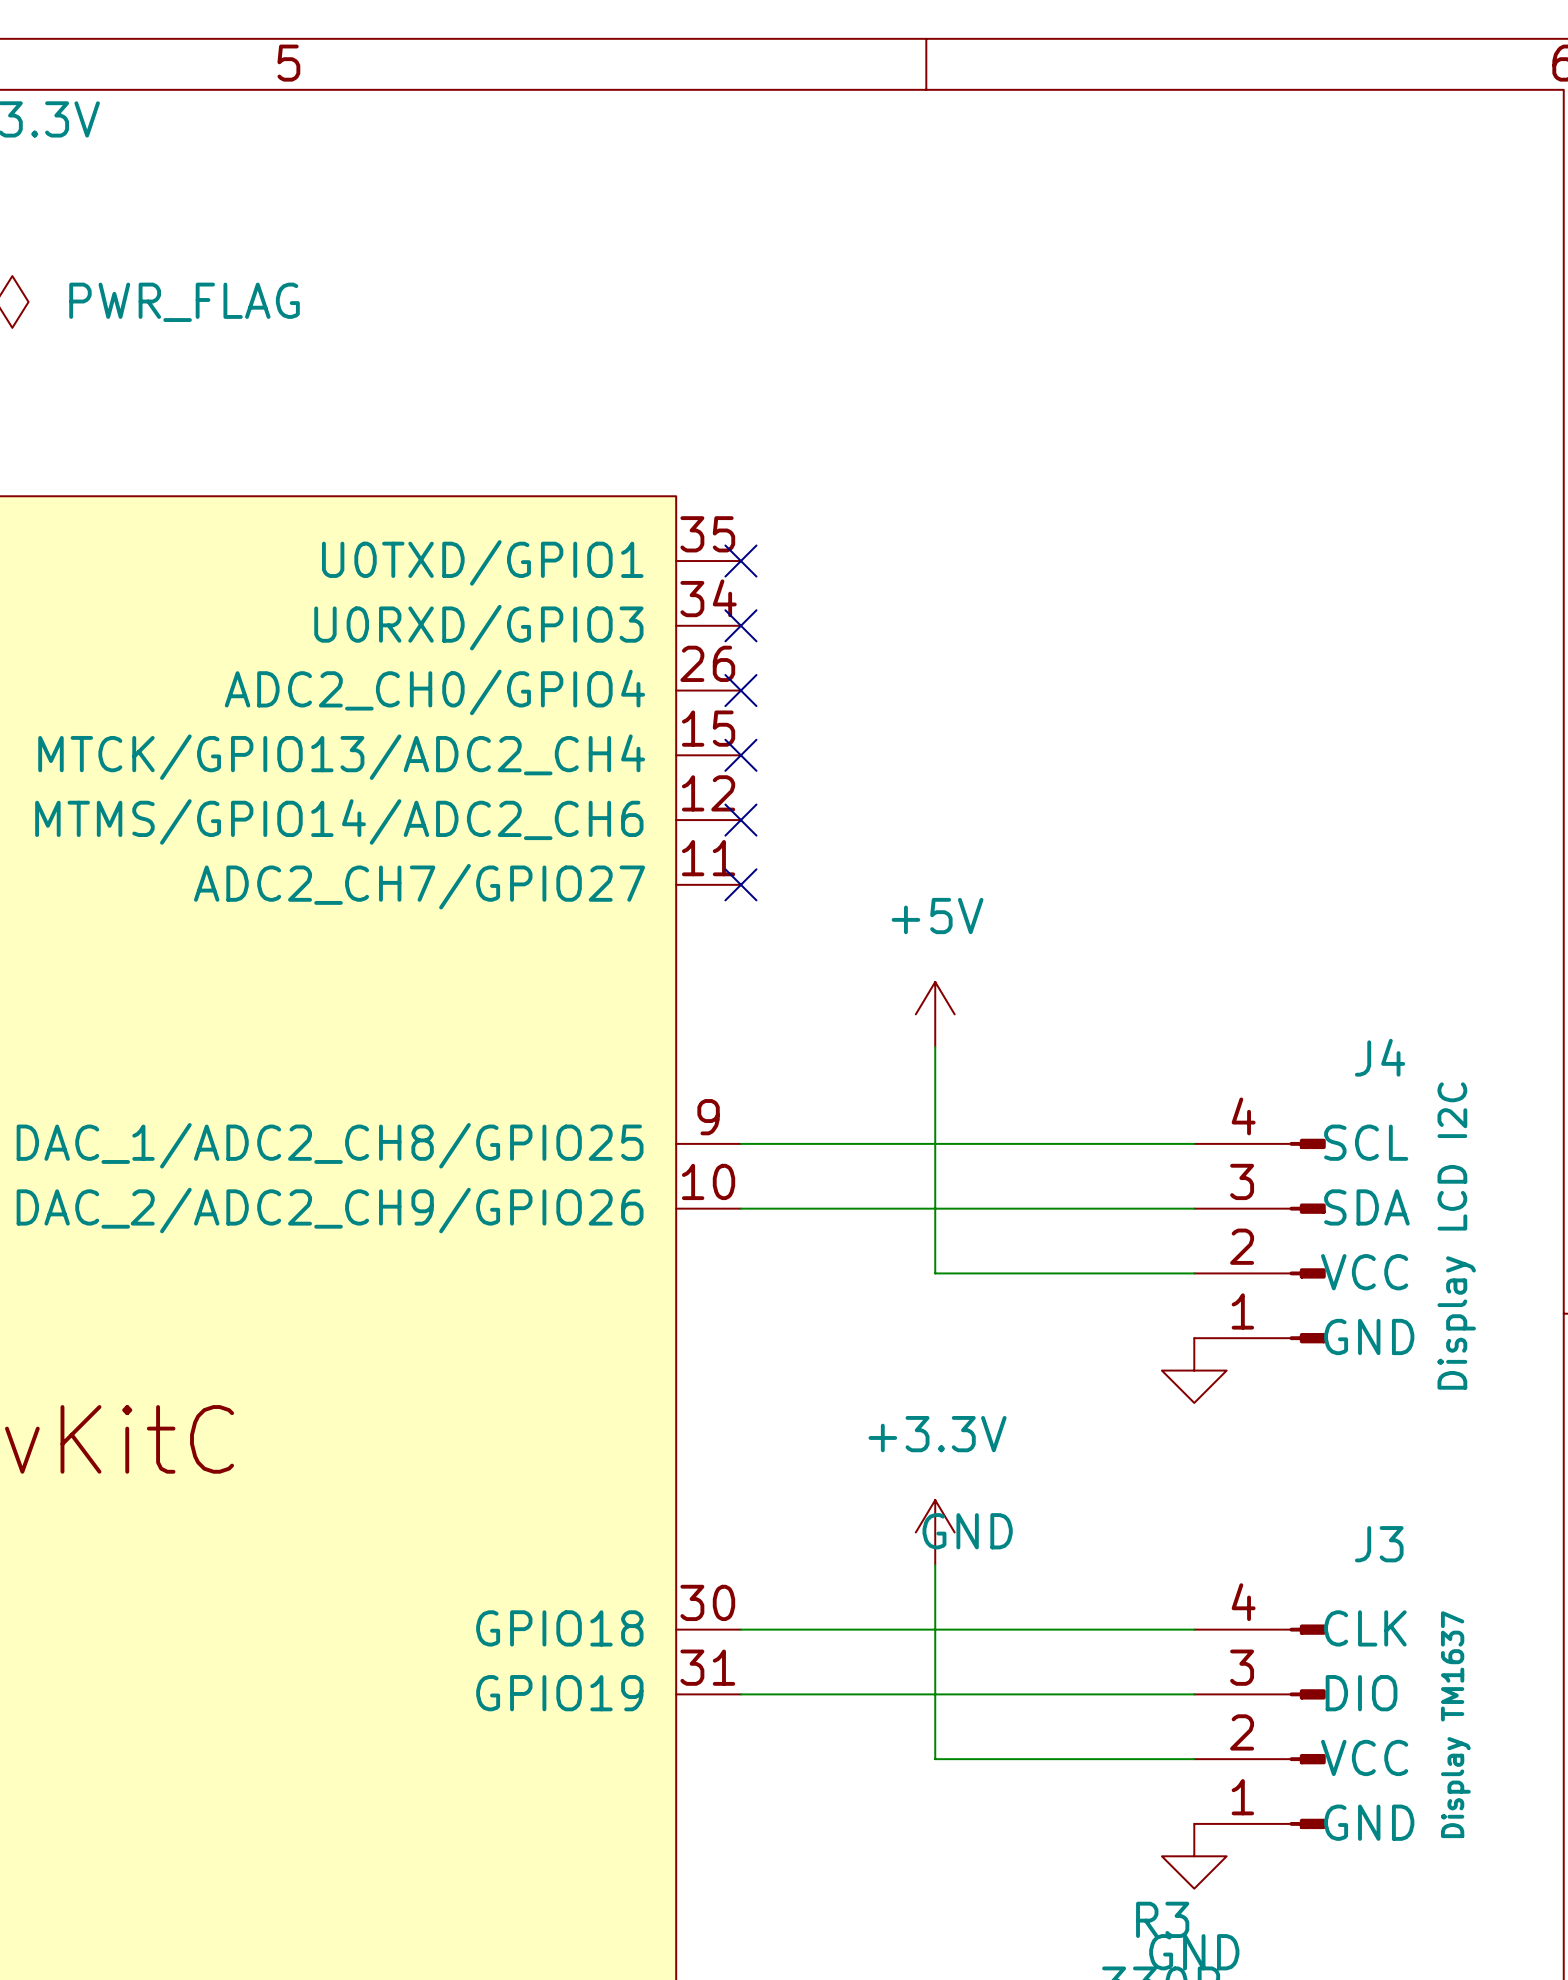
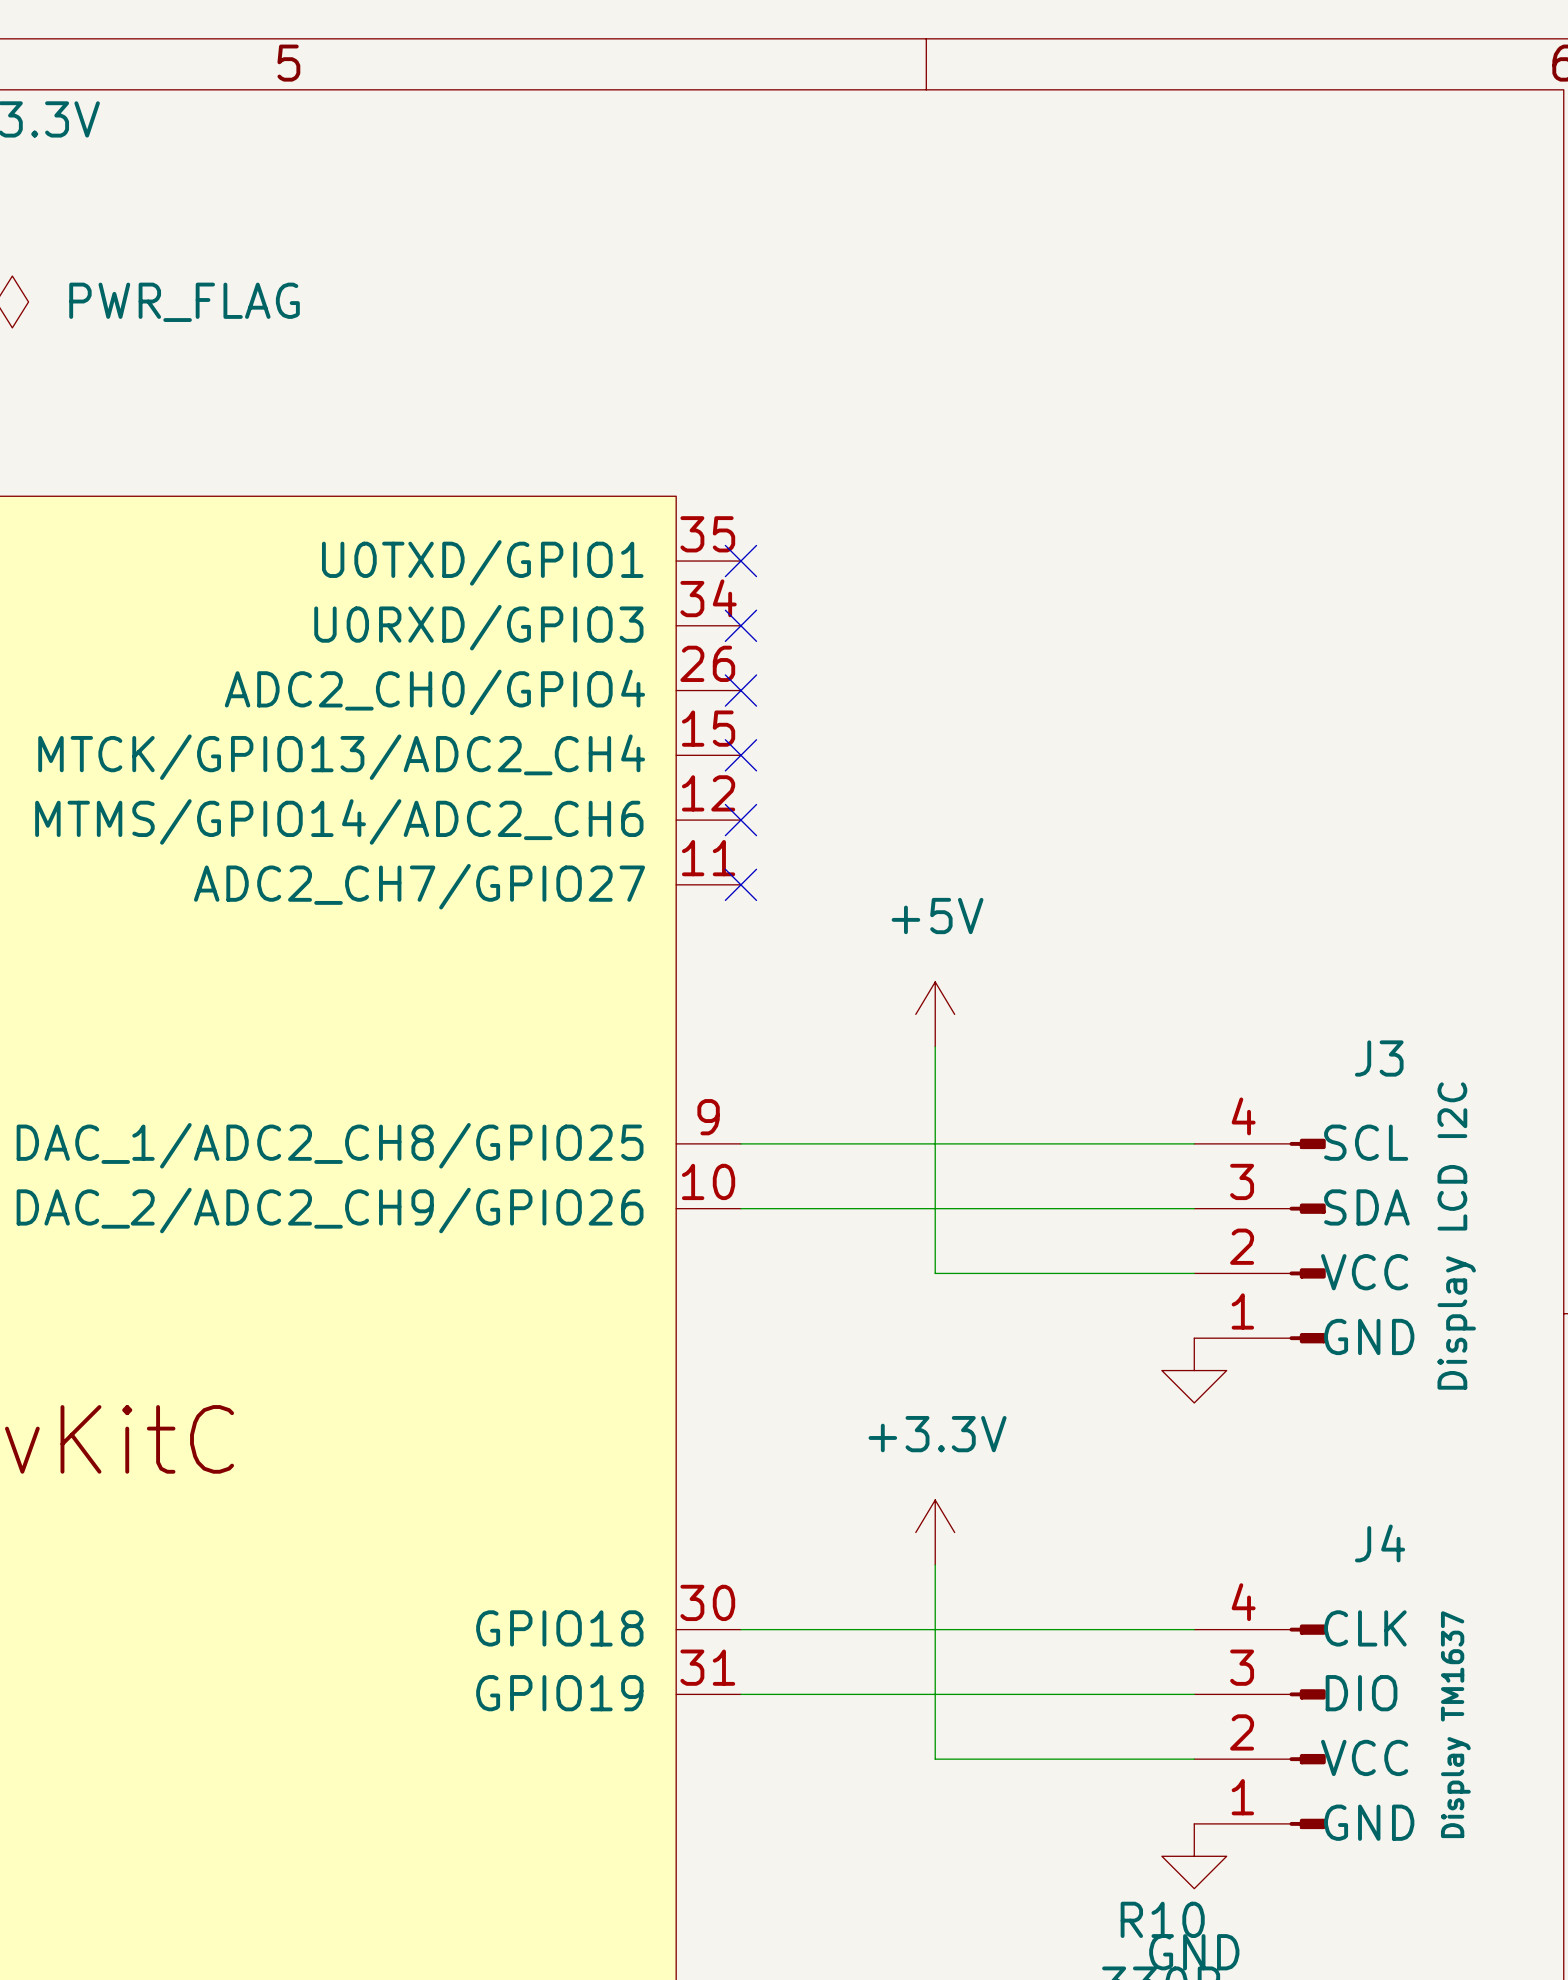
J4 name: J4 (1380, 1057) -> J3 (1379, 1058)
power symbol text: GND (967, 1531) -> none
J3 name: J3 (1379, 1544) -> J4 (1380, 1543)
R3 name: R3 (1162, 1919) -> R10 (1162, 1919)

